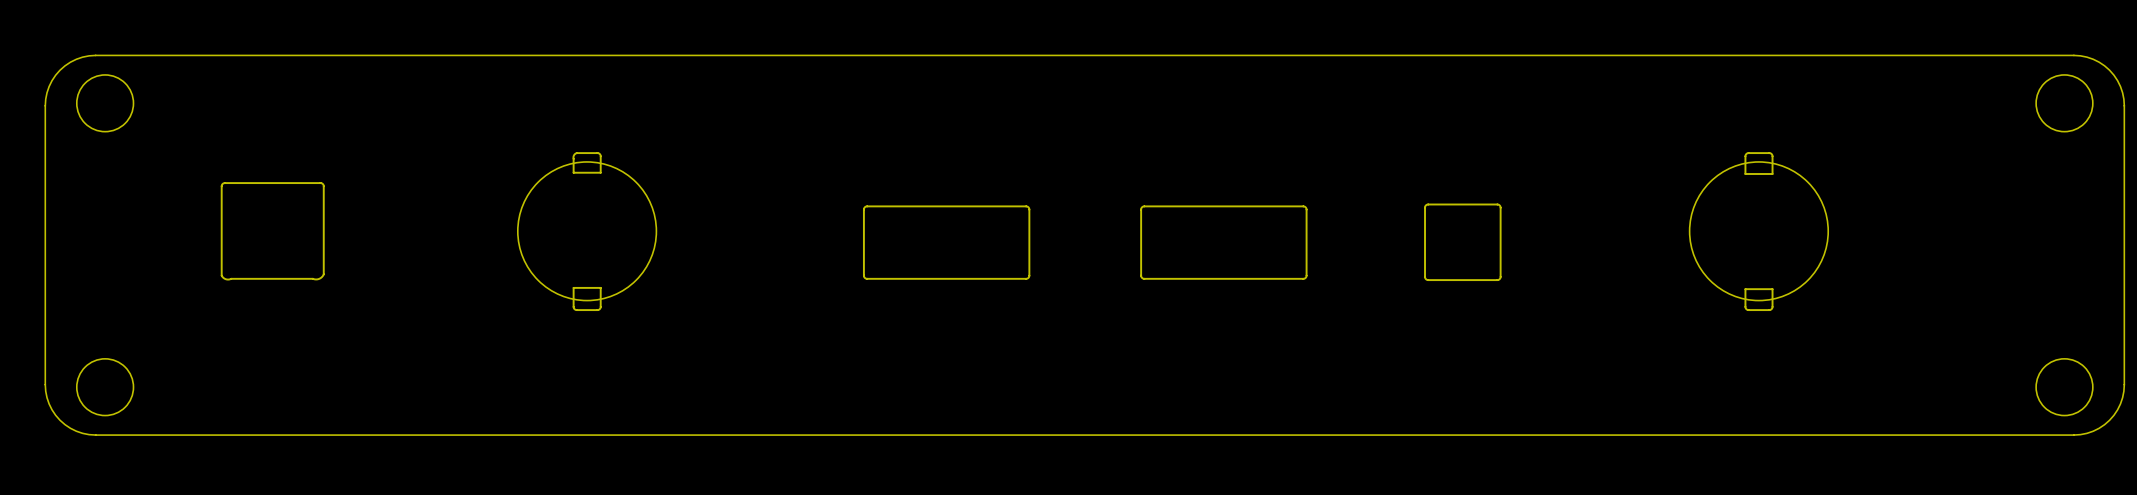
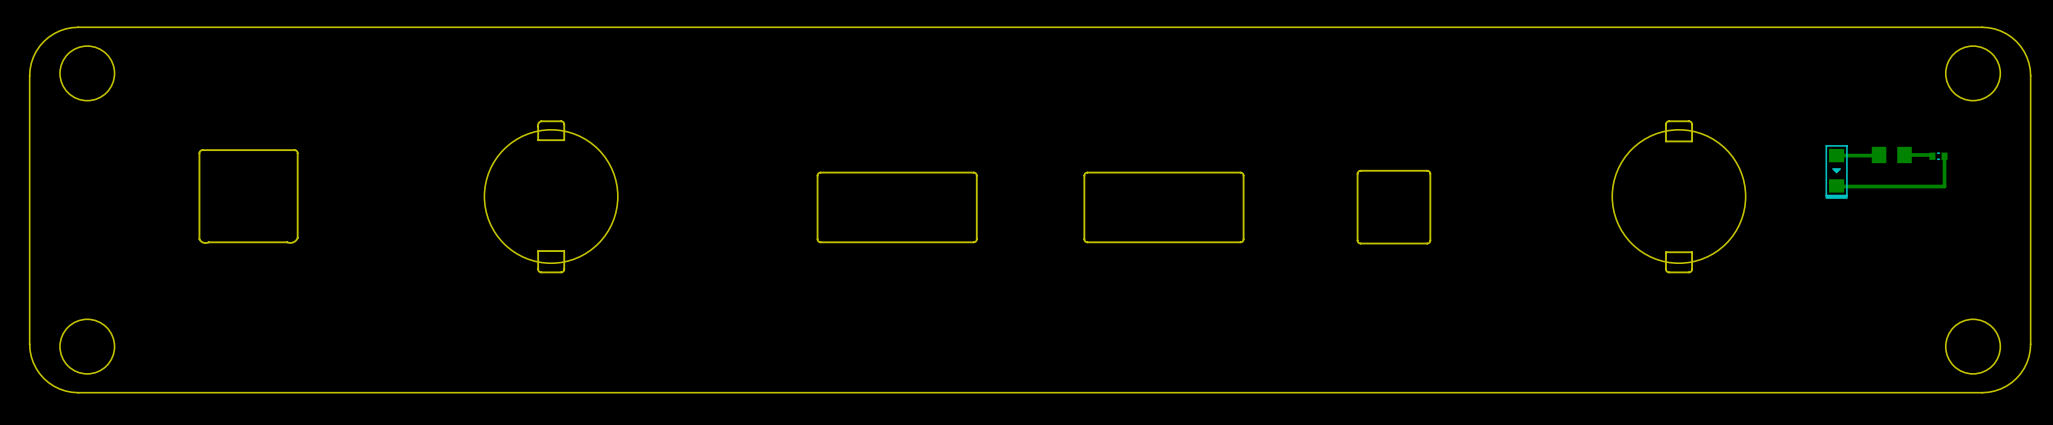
bottom track: none -> (1879, 154) (1836, 155)
part: none -> (1891, 154)
bottom track: none -> (1904, 154) (1932, 156)
part: none -> (1938, 156)
bottom track: none -> (1944, 156) (1944, 186) (1836, 185)
part: none -> (1836, 171)

